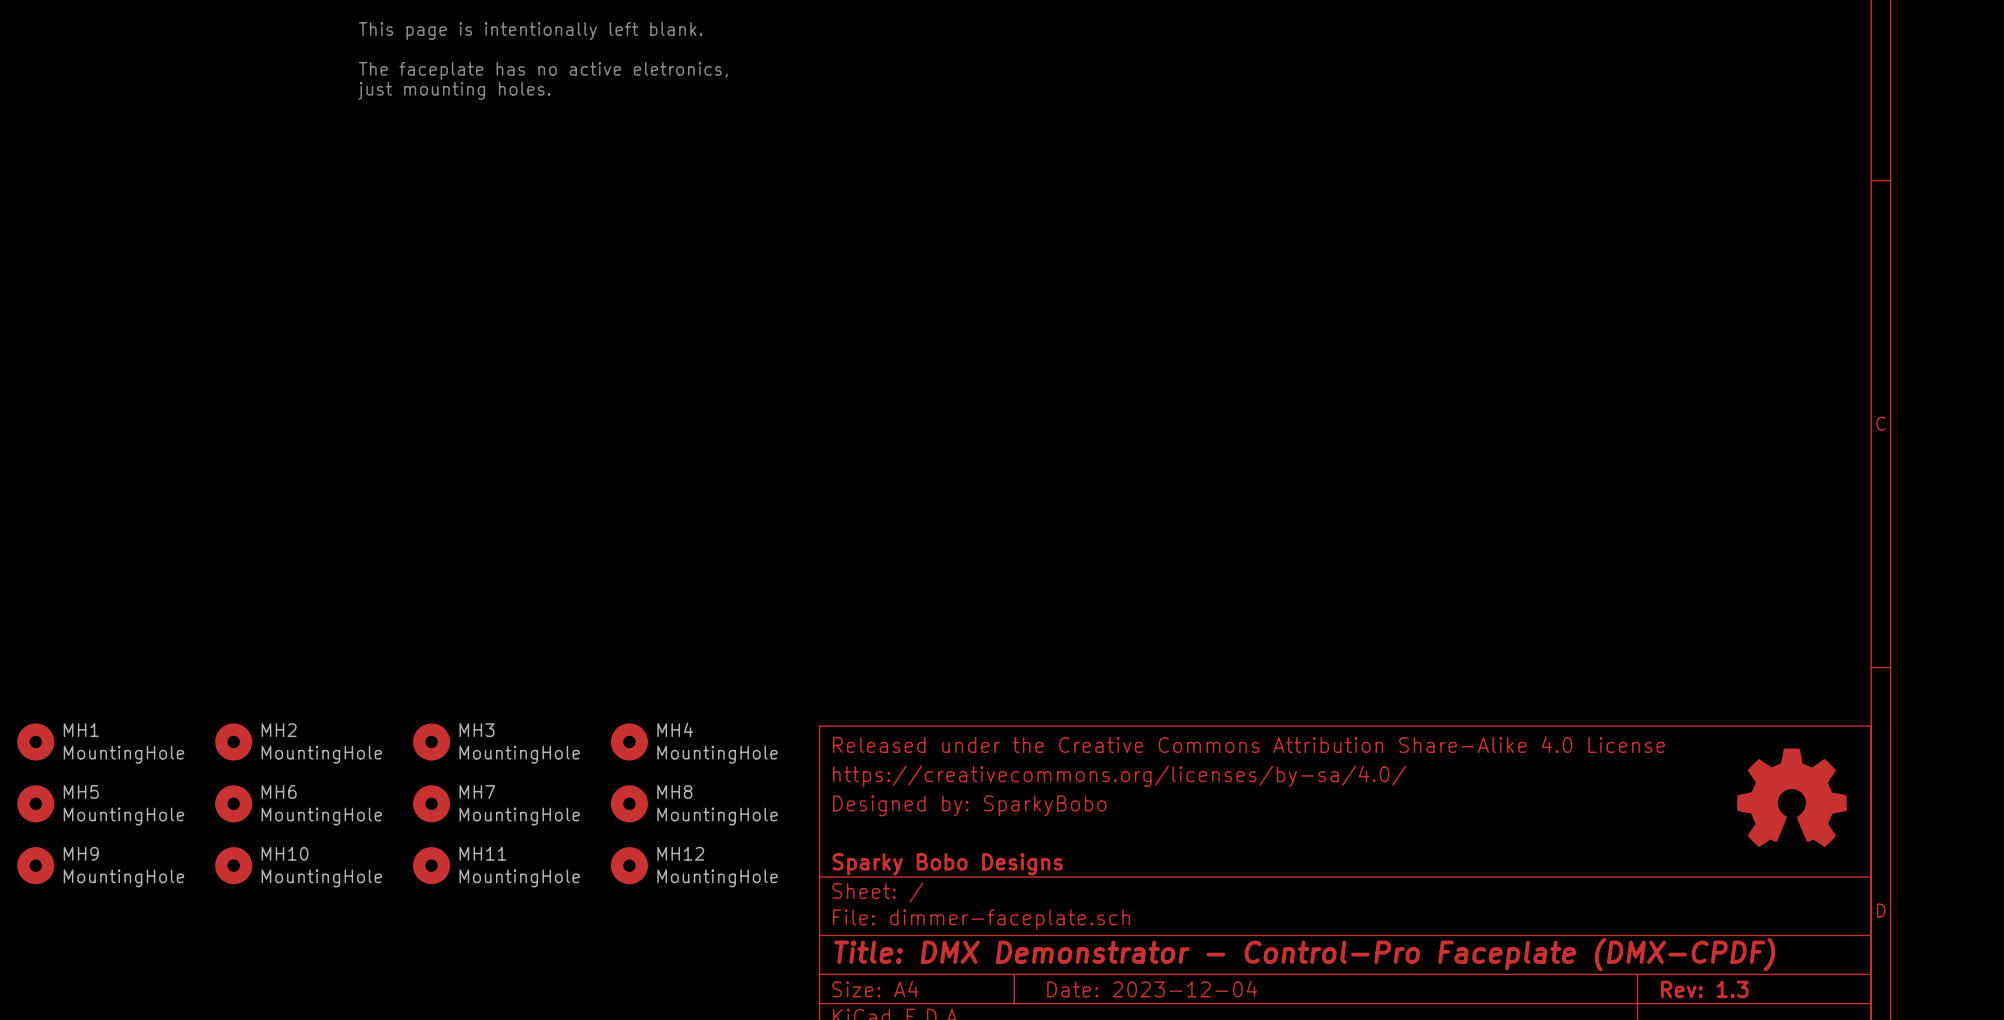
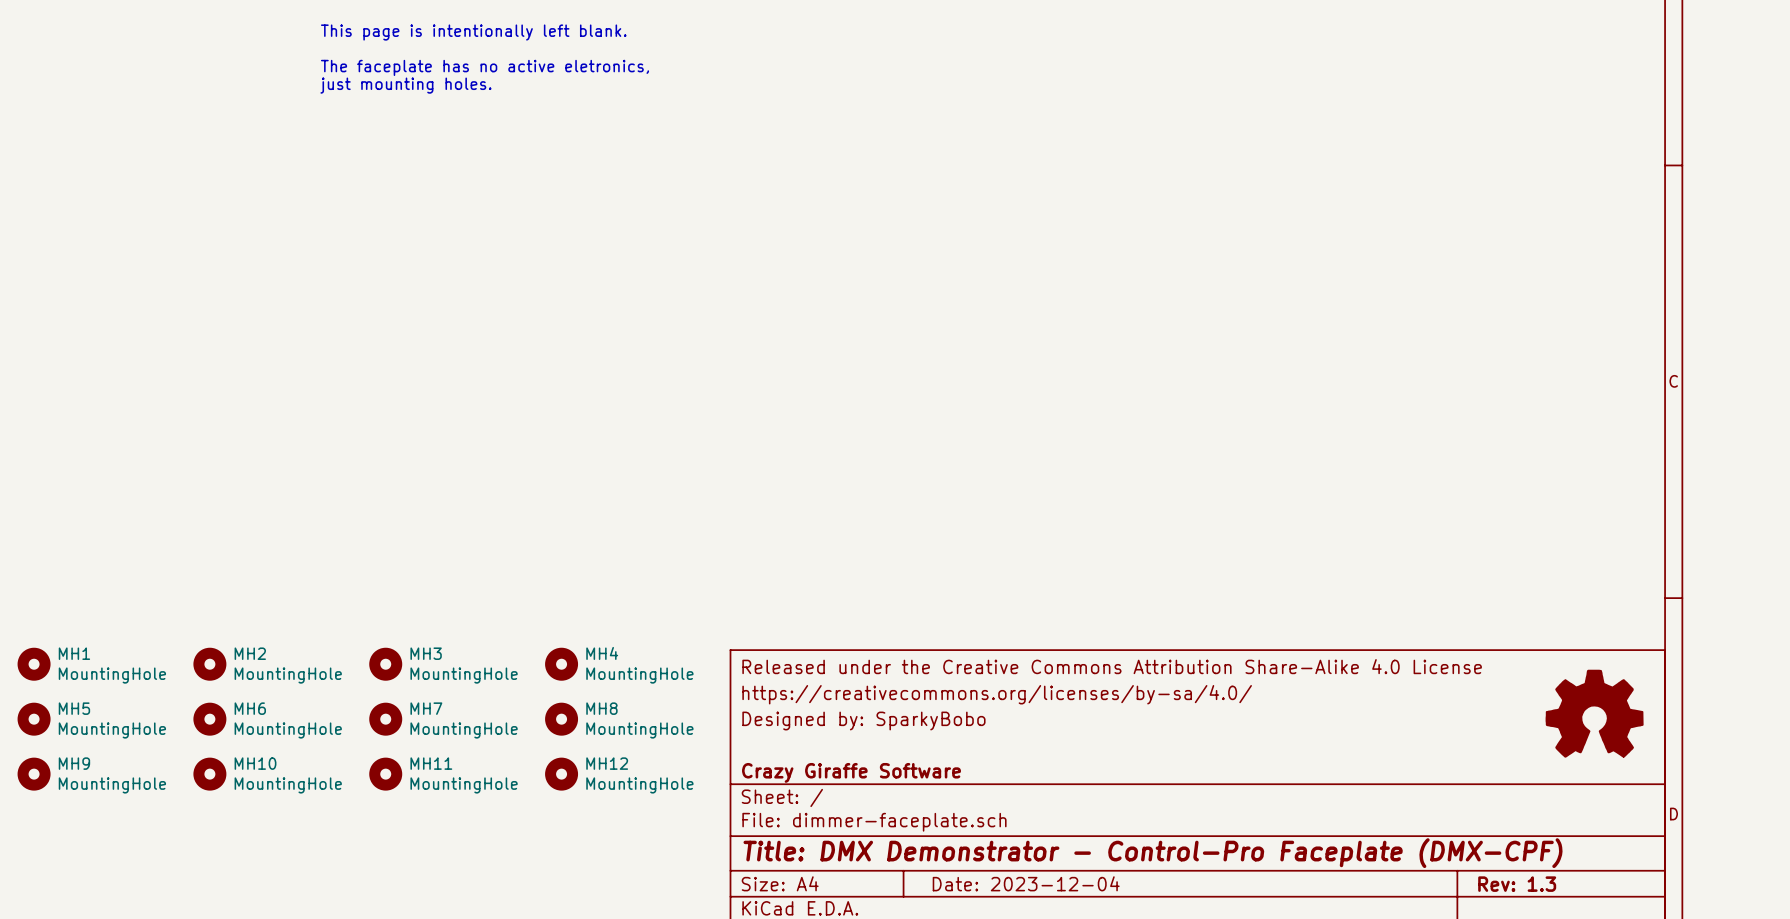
title block: Sparky Bobo Designs (947, 864) -> Crazy Giraffe Software (851, 772)
title block: Title: DMX Demonstrator - Control-Pro Faceplate (DMX-CPDF) (1304, 954) -> Title: DMX Demonstrator - Control-Pro Faceplate (DMX-CPF) (1153, 853)

